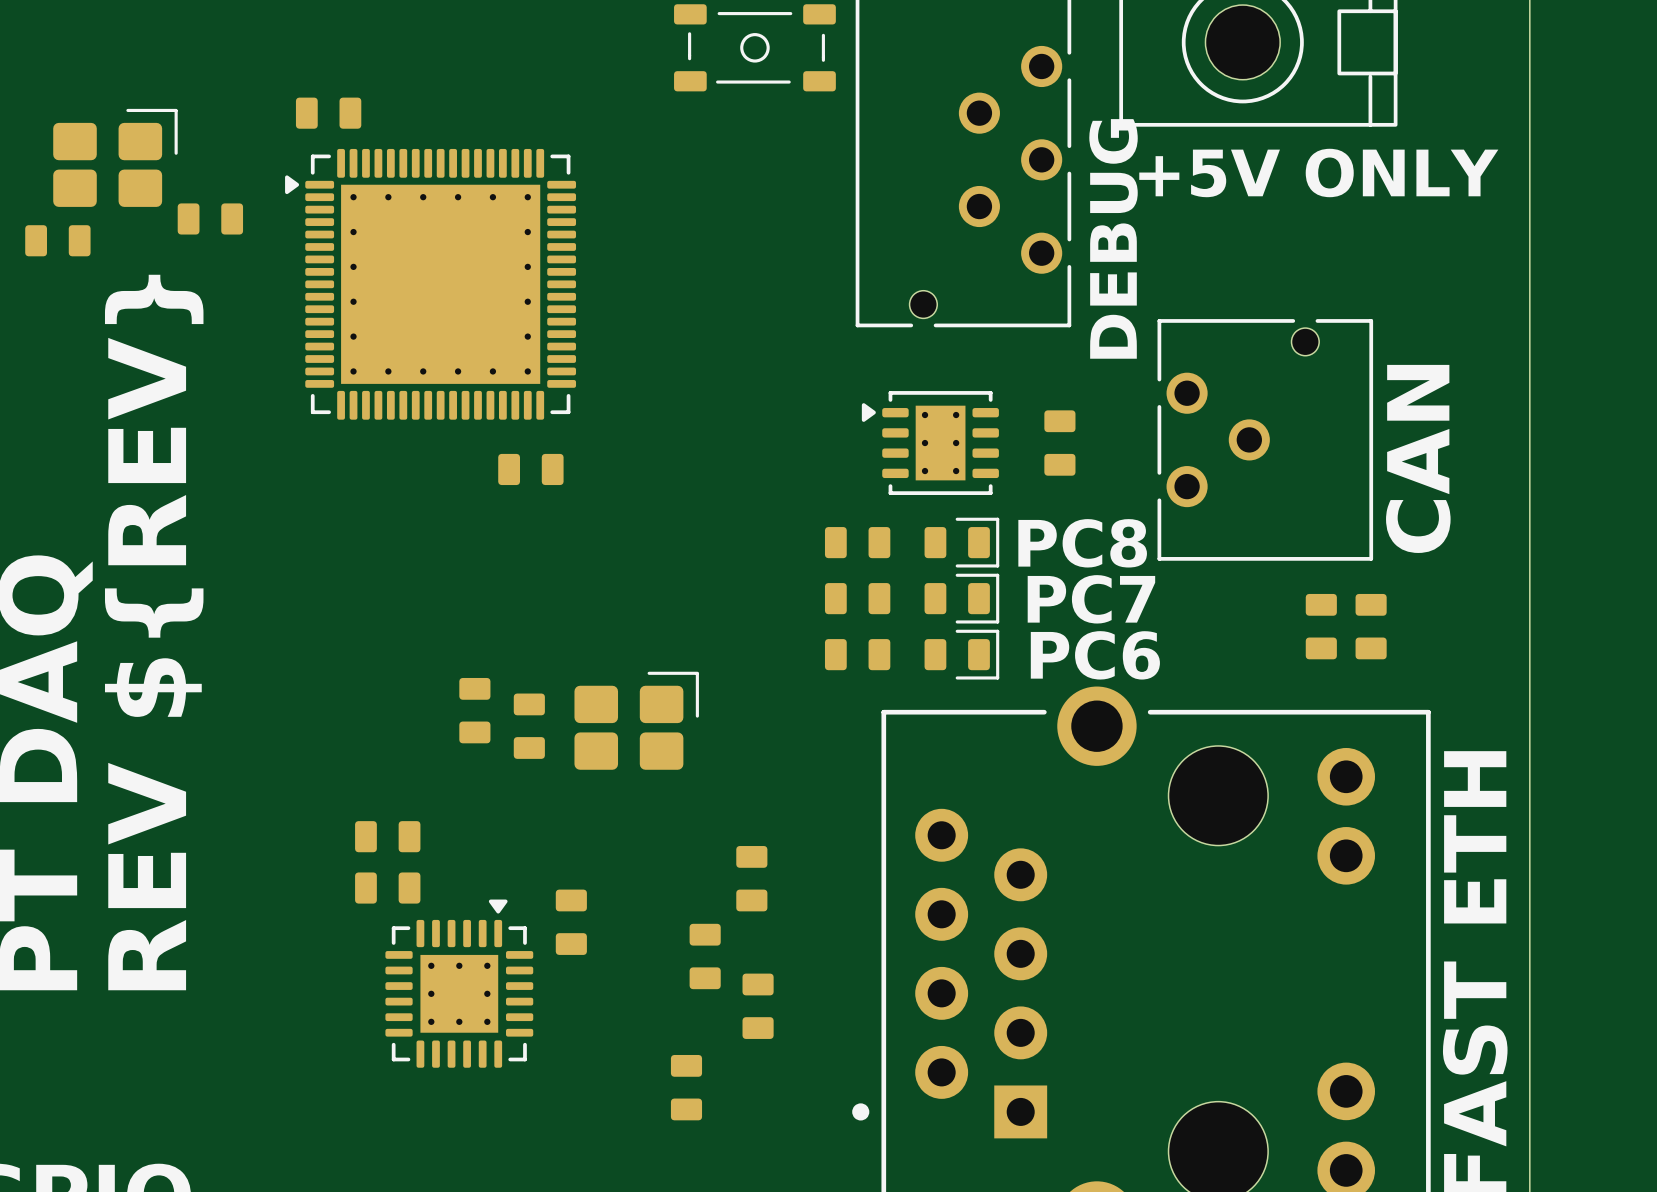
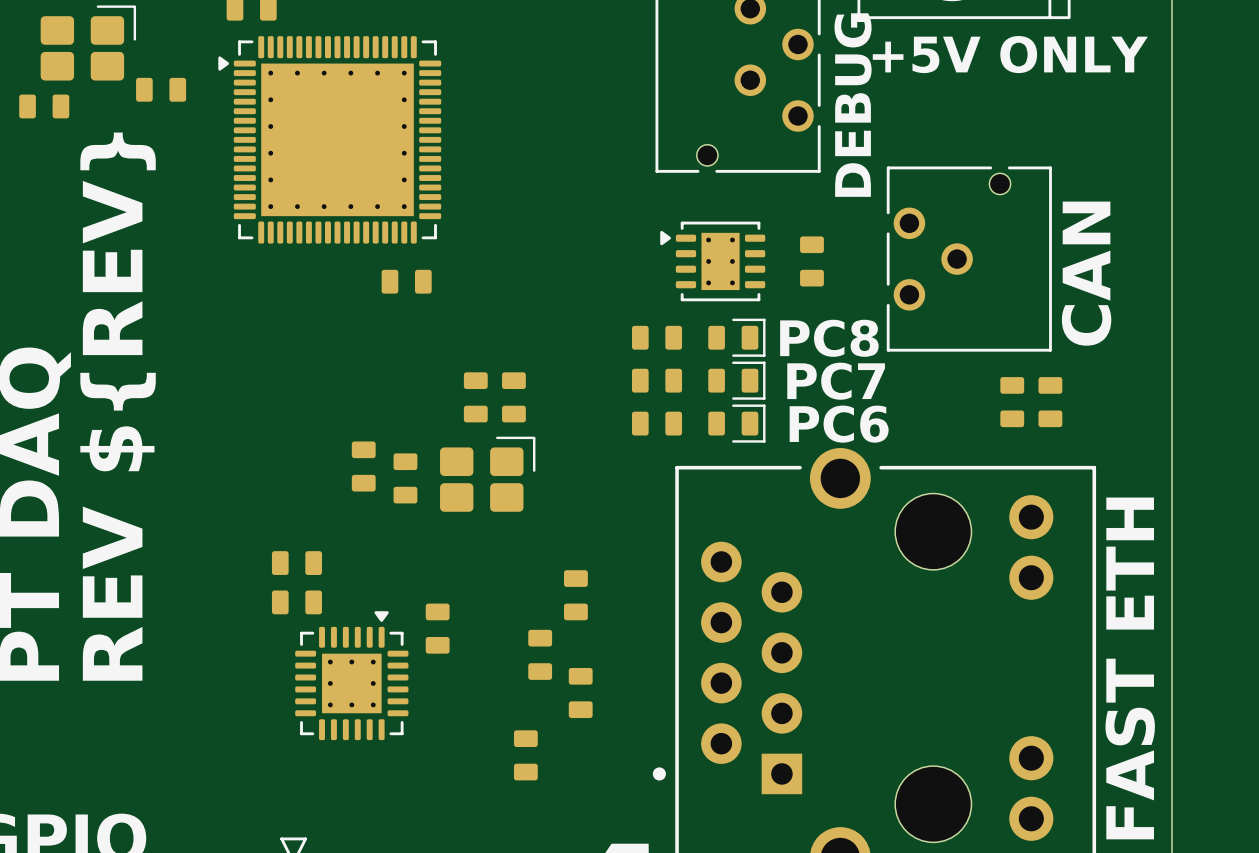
part: none -> (475, 397)
part: none -> (513, 397)

